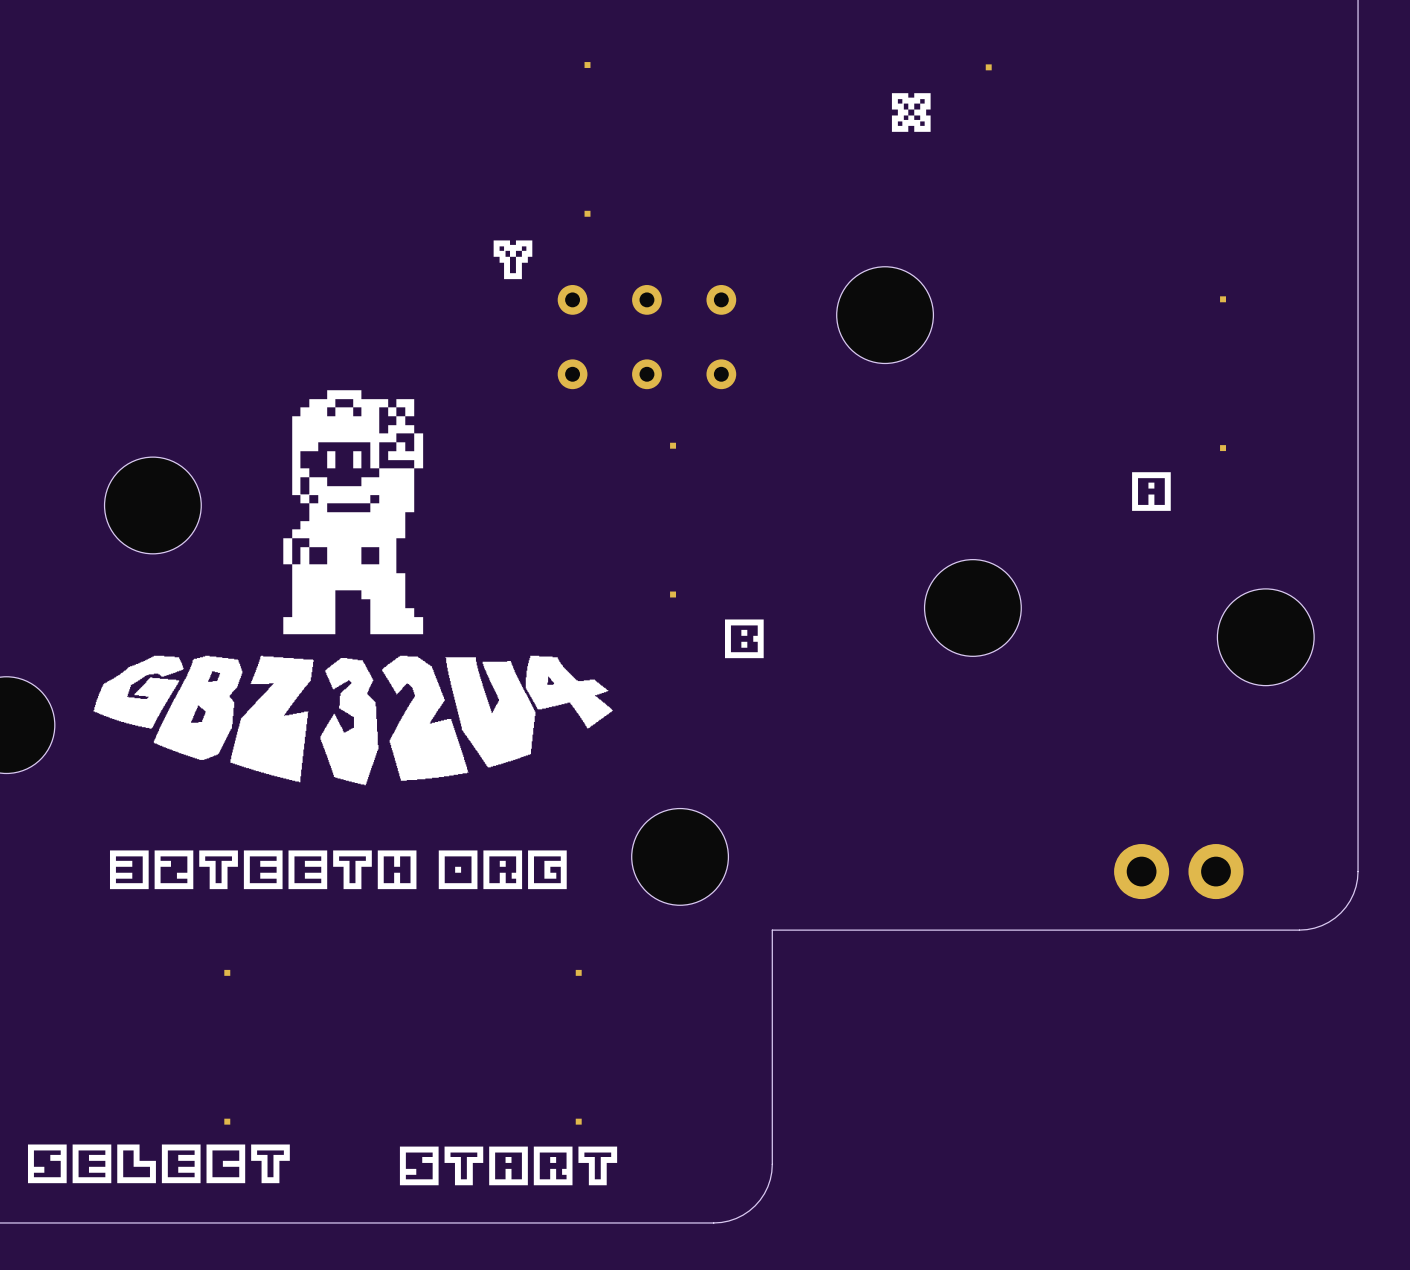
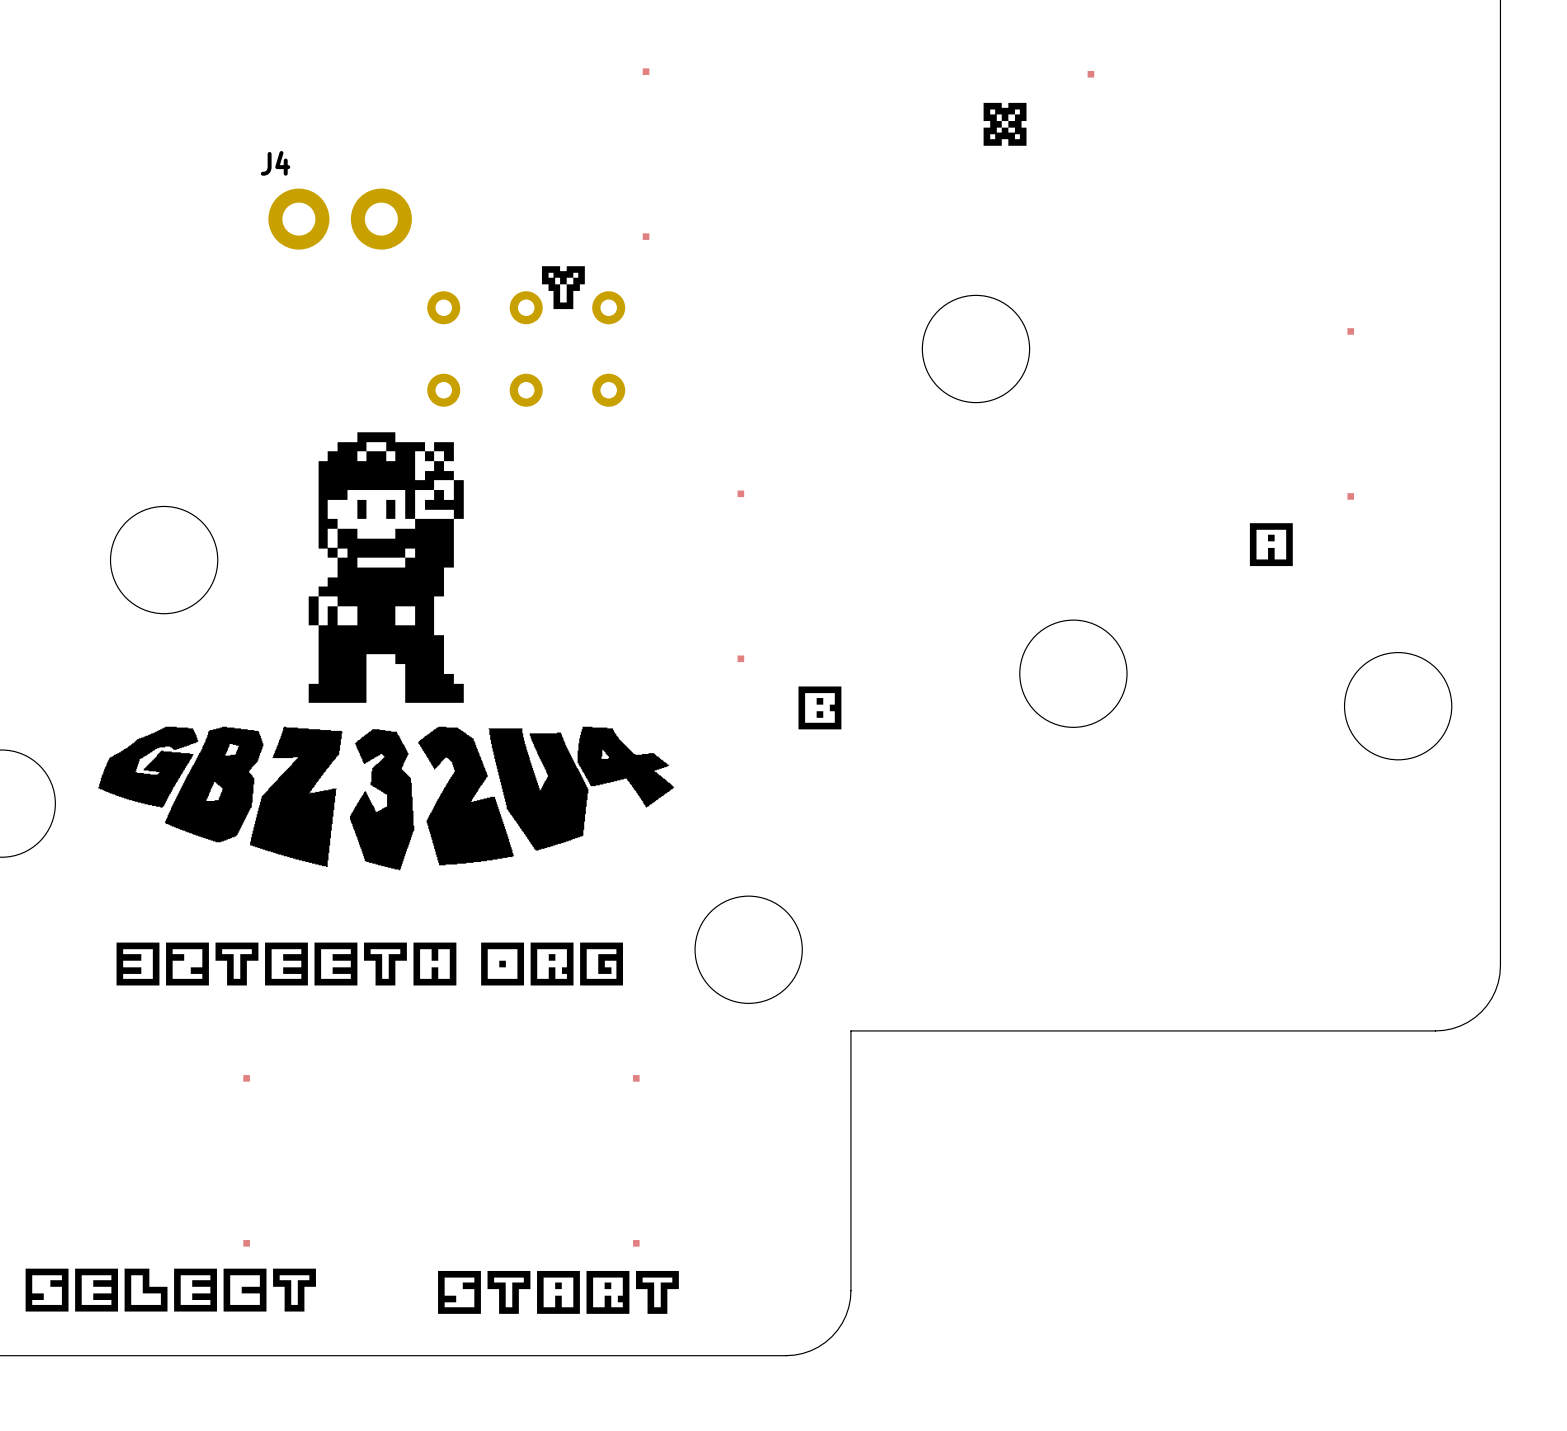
J4: none -> (340, 219)
part position: (646, 337) -> (526, 348)
part: (1178, 871) -> none

